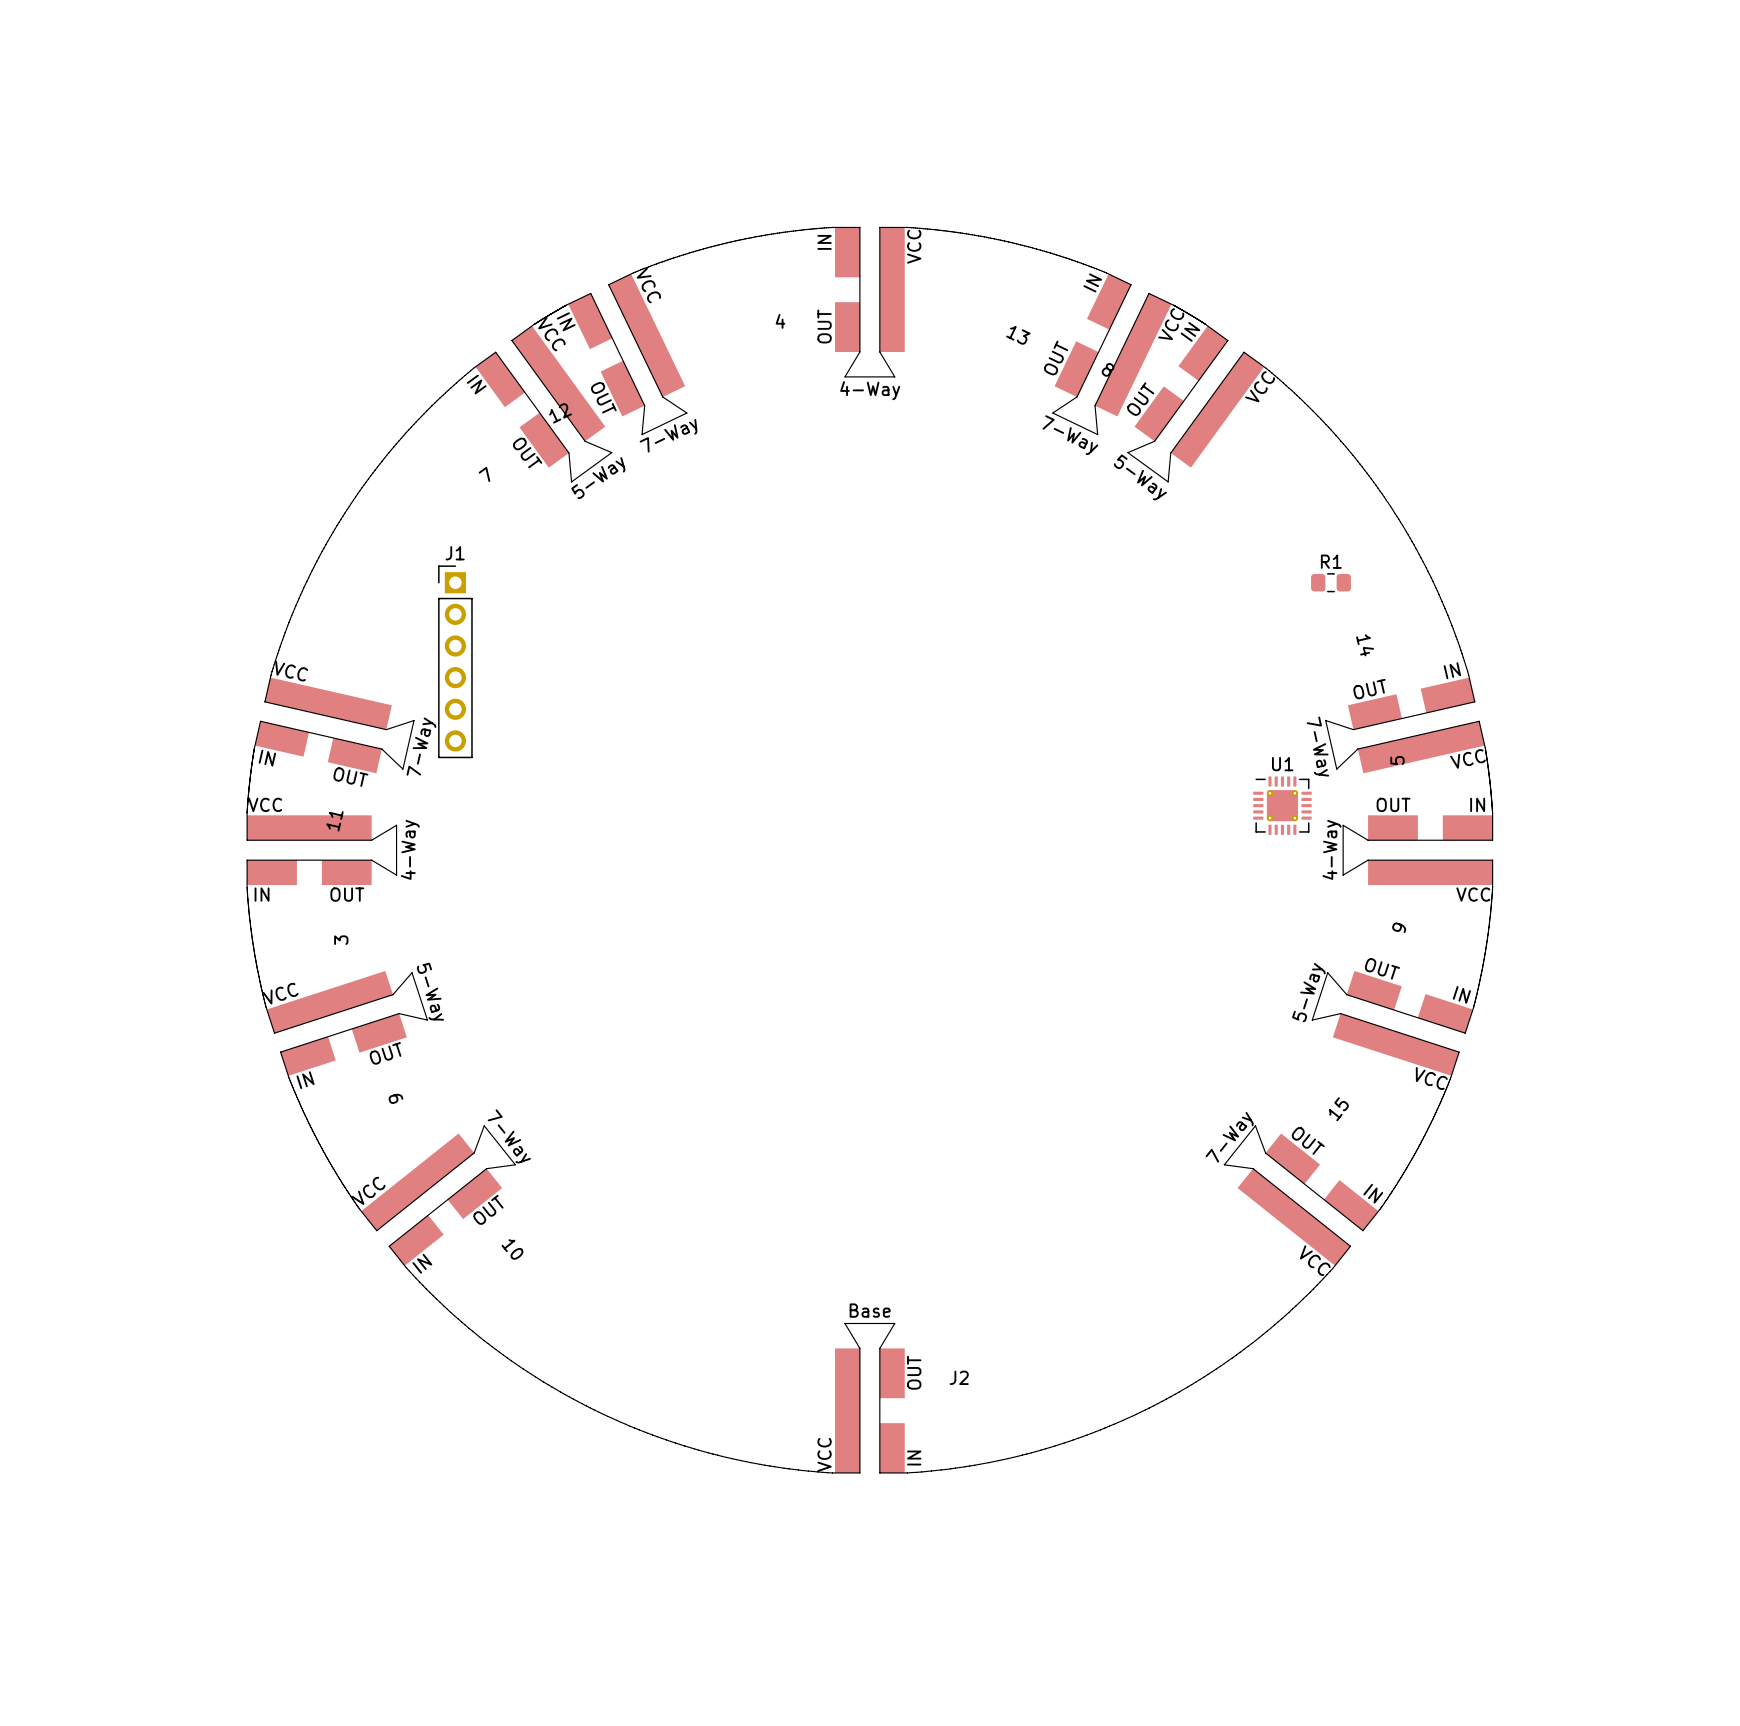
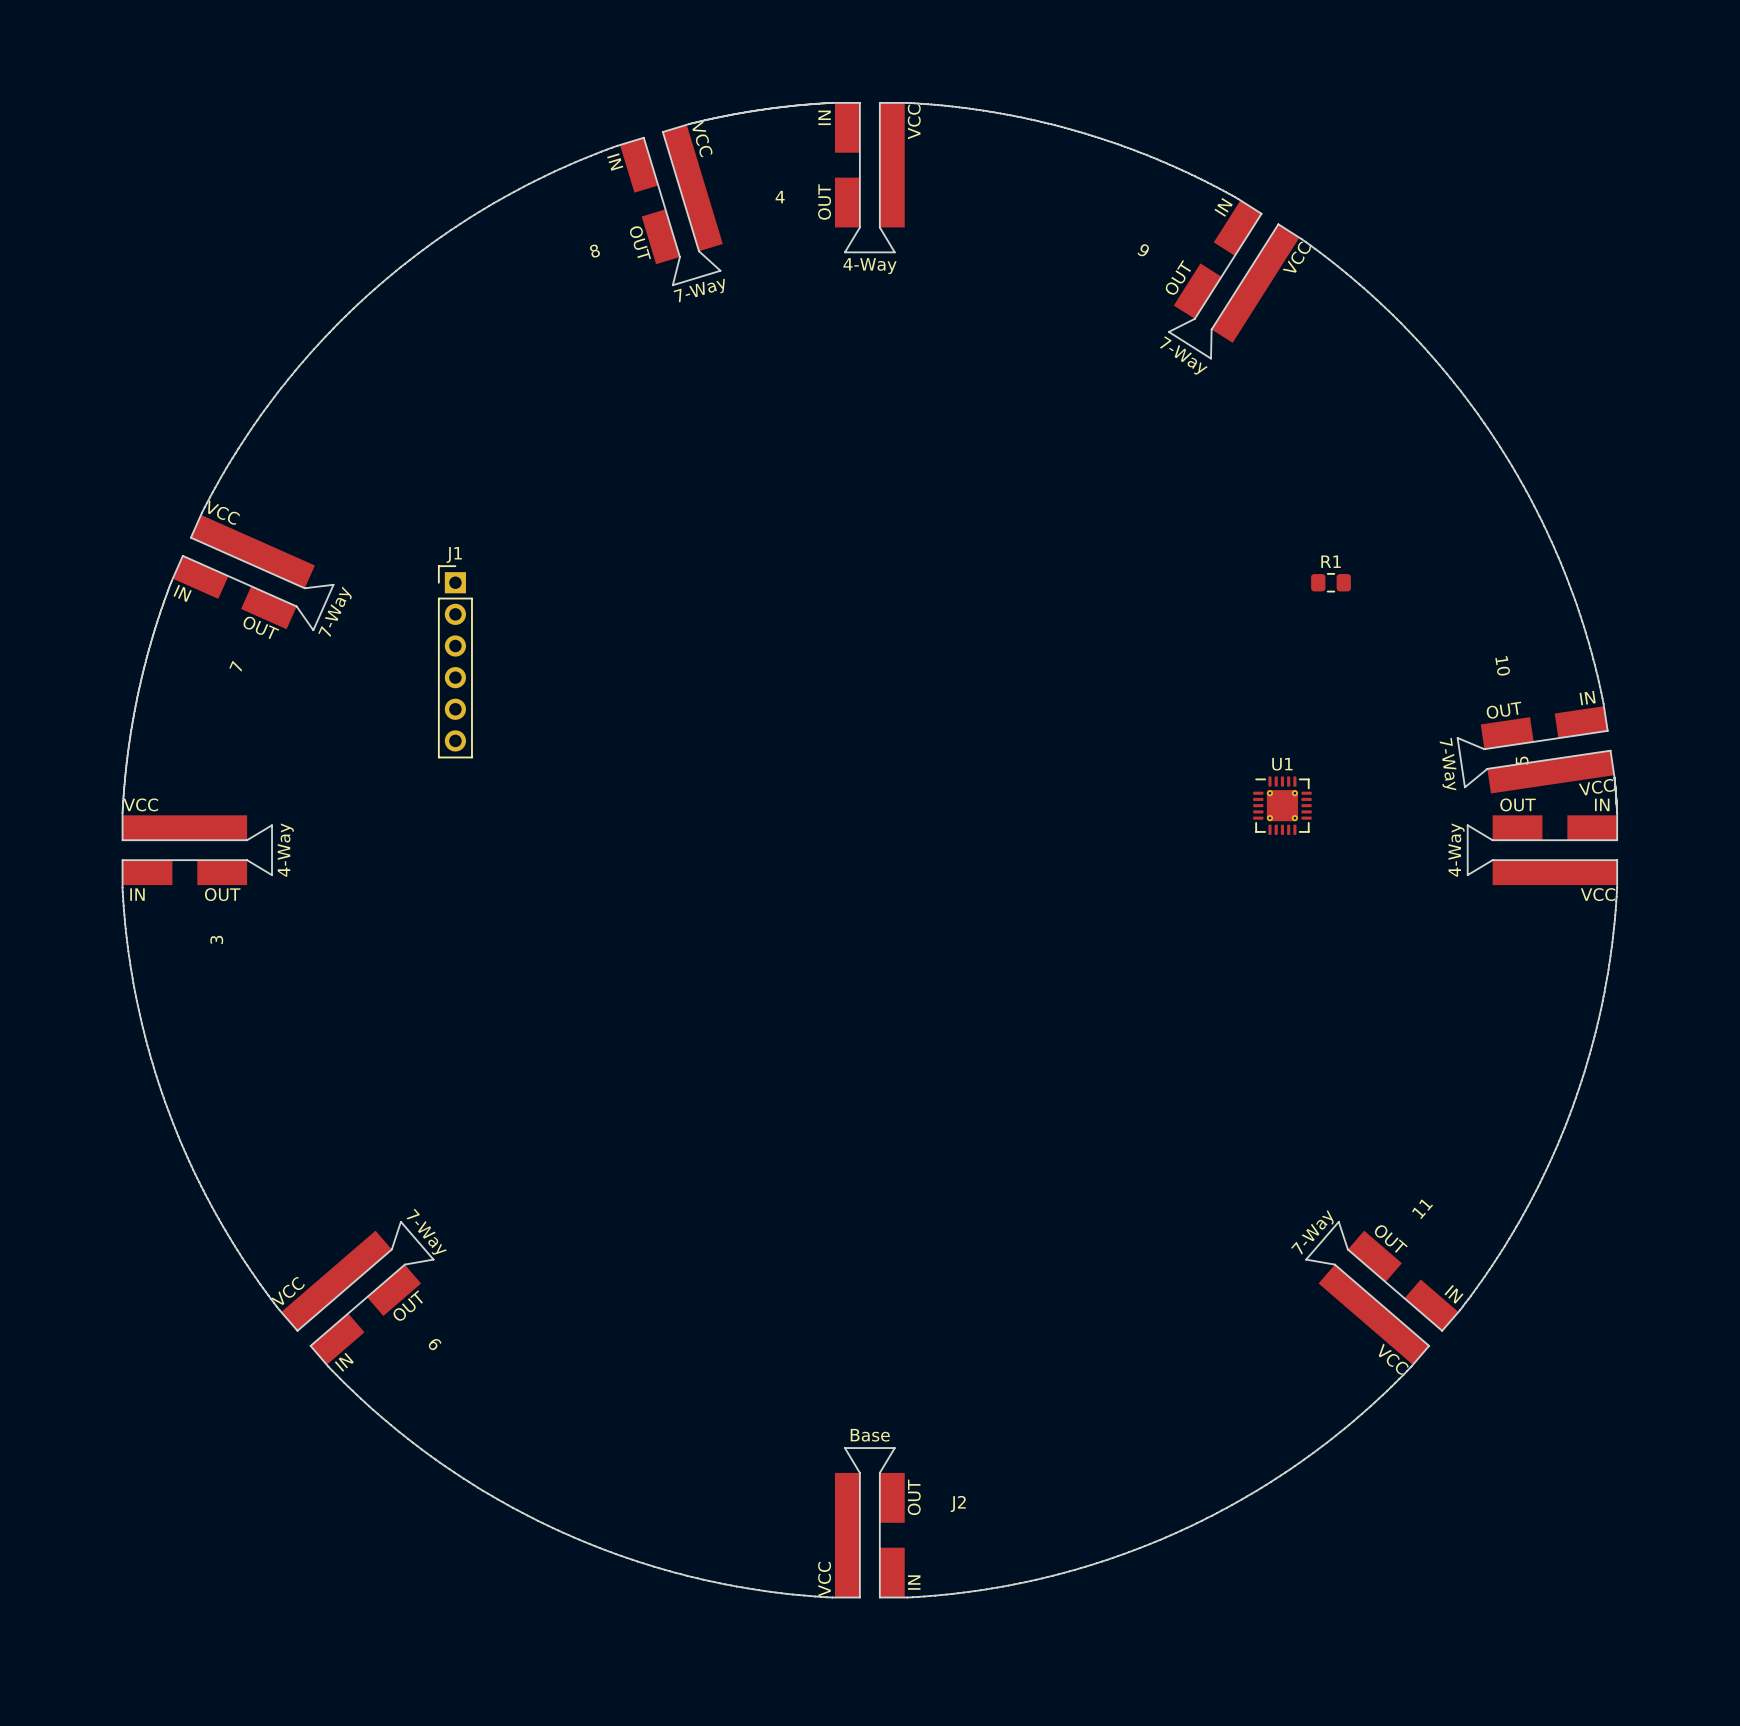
board edge: (832, 227) (859, 227) (859, 351) (844, 376) (894, 376) (879, 351) (879, 227) (907, 227) (966, 233) (1030, 247) (1093, 267) (1131, 284) (1076, 396) (1052, 413) (1097, 434) (1095, 405) (1148, 293) (1186, 312) (1227, 340) (1154, 441) (1127, 452) (1168, 481) (1170, 453) (1244, 352) (1277, 377) (1315, 413) (1345, 446) (1375, 485) (1404, 528) (1429, 574) (1447, 615) (1466, 667) (1474, 701) (1353, 729) (1325, 720) (1336, 769) (1357, 749) (1479, 721) (1487, 759) (1492, 812) (1492, 840) (1368, 840) (1343, 825) (1343, 875) (1368, 860) (1492, 860) (1491, 897) (1485, 951) (1475, 998) (1465, 1033) (1346, 994) (1327, 972) (1312, 1020) (1340, 1013) (1459, 1052) (1447, 1085) (1427, 1129) (1405, 1170) (1380, 1209) (1362, 1230) (1265, 1152) (1255, 1125) (1224, 1164) (1253, 1168) (1350, 1246) (1333, 1267) (1288, 1312) (1244, 1349) (1187, 1387) (1136, 1414) (1086, 1435) (1026, 1454) (974, 1465) (907, 1472) (879, 1472) (879, 1348) (894, 1323) (844, 1323) (859, 1348) (859, 1472) (832, 1472) (784, 1468) (731, 1458) (684, 1446) (630, 1426) (590, 1408) (543, 1382) (491, 1346) (454, 1315) (416, 1278) (389, 1246) (486, 1168) (515, 1164) (484, 1125) (474, 1152) (376, 1230) (348, 1193) (320, 1145) (297, 1097) (280, 1052) (399, 1013) (427, 1020) (412, 972) (392, 994) (274, 1033) (266, 1007) (256, 966) (247, 892) (247, 860) (371, 860) (396, 875) (396, 825) (371, 840) (247, 840) (247, 812) (252, 757) (260, 721) (381, 749) (402, 769) (414, 720) (386, 729) (264, 701) (272, 671) (285, 632) (316, 561) (361, 488) (406, 432) (453, 385) (495, 352) (568, 453) (571, 481) (611, 452) (585, 441) (511, 340) (551, 313) (590, 293) (644, 405) (642, 434) (686, 413) (662, 396) (608, 284) (654, 264) (711, 246) (773, 233) (832, 227) -> (831, 102) (748, 111) (692, 123) (662, 132) (698, 251) (720, 270) (672, 285) (679, 257) (643, 137) (601, 151) (554, 171) (469, 217) (427, 246) (387, 278) (349, 312) (310, 353) (277, 392) (238, 448) (209, 497) (190, 537) (304, 588) (333, 584) (313, 630) (296, 606) (182, 555) (161, 607) (143, 669) (131, 730) (123, 796) (122, 840) (247, 840) (272, 825) (272, 875) (247, 860) (122, 860) (122, 892) (127, 946) (136, 1001) (147, 1045) (165, 1102) (183, 1149) (211, 1206) (244, 1261) (279, 1310) (297, 1330) (391, 1249) (400, 1221) (433, 1259) (404, 1264) (310, 1345) (328, 1366) (369, 1406) (421, 1449) (463, 1478) (512, 1507) (573, 1537) (637, 1561) (692, 1577) (747, 1588) (815, 1596) (859, 1597) (859, 1472) (844, 1448) (894, 1448) (879, 1472) (879, 1597) (912, 1597) (986, 1589) (1058, 1574) (1123, 1554) (1186, 1528) (1251, 1493) (1308, 1456) (1362, 1413) (1411, 1366) (1429, 1345) (1334, 1264) (1306, 1259) (1338, 1221) (1347, 1249) (1442, 1330) (1487, 1273) (1514, 1230) (1538, 1186) (1566, 1123) (1583, 1076) (1598, 1018) (1608, 969) (1616, 905) (1617, 860) (1492, 860) (1467, 875) (1467, 825) (1492, 840) (1617, 840) (1617, 809) (1610, 750) (1487, 768) (1464, 787) (1457, 737) (1484, 749) (1607, 730) (1603, 703) (1588, 643) (1567, 578) (1542, 521) (1518, 476) (1481, 418) (1446, 373) (1401, 323) (1368, 291) (1319, 252) (1278, 224) (1211, 329) (1211, 358) (1168, 331) (1194, 318) (1261, 213) (1232, 195) (1185, 171) (1105, 139) (1021, 117) (935, 104) (879, 102) (879, 227) (894, 252) (844, 252) (859, 227) (859, 102) (831, 102)
4 position: (869, 289) -> (869, 165)
12: 7-Way (626, 345) -> none
13: 7-Way (1112, 345) -> none
7 rotation: 0° (540, 396) -> 30.1° counterclockwise (243, 572)
7 position: (540, 396) -> (243, 572)
8 rotation: 0° (1199, 396) -> 52.8° counterclockwise (671, 194)
8 position: (1199, 396) -> (671, 194)
8 value: 5-Way (1140, 477) -> 7-Way (699, 290)
7 value: 5-Way (598, 478) -> 7-Way (335, 611)
11 rotation: 0° (323, 725) -> 152.1° counterclockwise (1388, 1297)
11 position: (323, 725) -> (1388, 1297)
14: 7-Way (1416, 725) -> none
3 position: (309, 850) -> (184, 850)
5 position: (1430, 850) -> (1554, 850)
6 value: 5-Way (430, 991) -> 7-Way (426, 1231)
9 value: 5-Way (1308, 992) -> 7-Way (1183, 355)
6 rotation: 0° (336, 1023) -> 22.8° counterclockwise (351, 1297)
6 position: (336, 1023) -> (351, 1297)
9 rotation: 0° (1402, 1023) -> 75.6° counterclockwise (1236, 271)
9 position: (1402, 1023) -> (1236, 271)
10 rotation: 0° (431, 1199) -> 149.9° counterclockwise (1547, 749)
10 position: (431, 1199) -> (1547, 749)
15: 7-Way (1308, 1199) -> none
J2 position: (869, 1410) -> (869, 1535)

